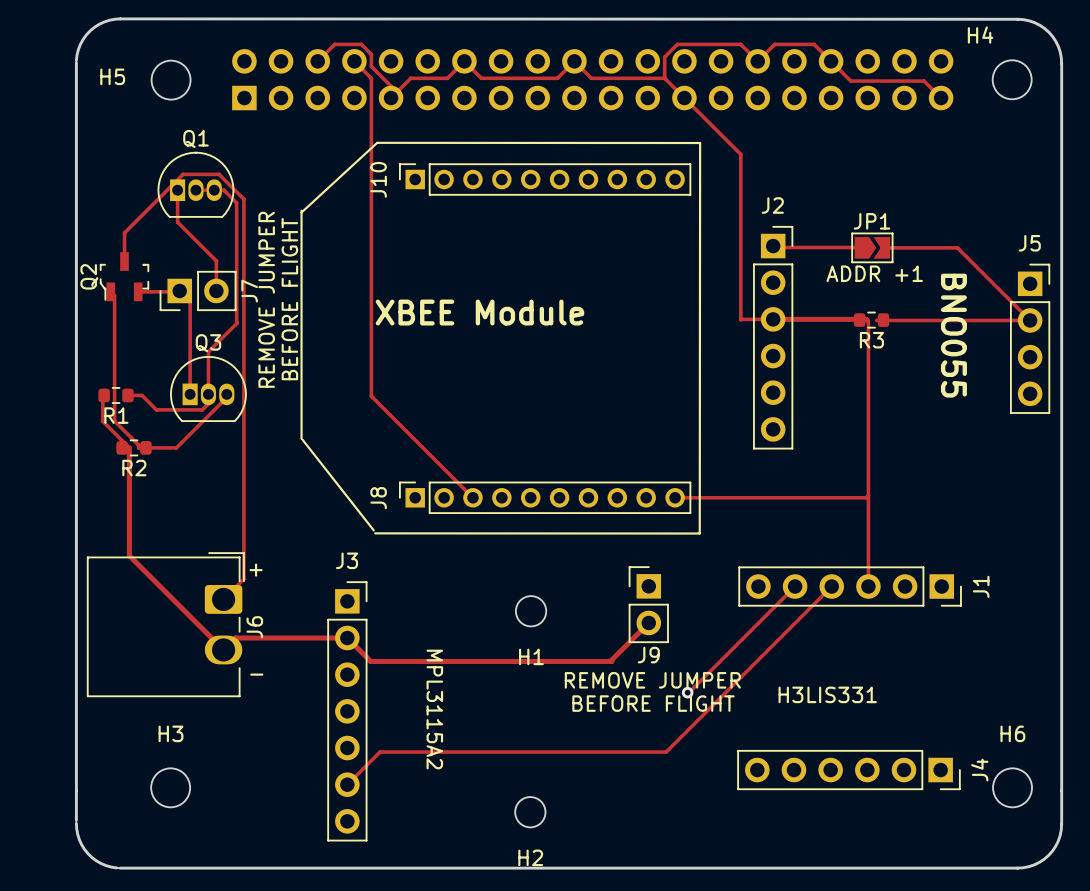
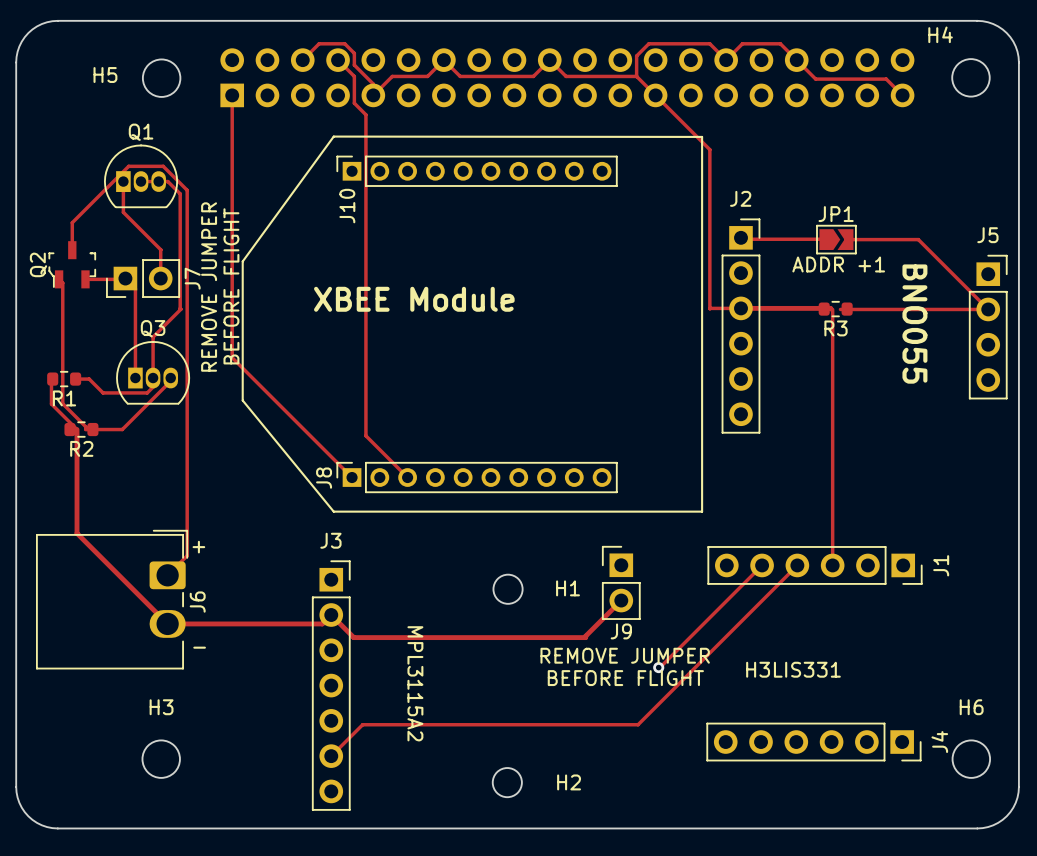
board edge: (120, 18) (1017, 19) (1034, 22) (1048, 32) (1058, 46) (1061, 63) (1061, 824) (1058, 840) (1048, 855) (1034, 864) (1017, 868) (120, 868) (106, 865) (91, 857) (79, 839) (76, 823) (76, 60) (80, 44) (90, 30) (104, 21) (120, 18) -> (57, 20) (41, 24) (28, 33) (19, 46) (16, 62) (16, 786) (21, 807) (32, 819) (41, 825) (57, 828) (977, 828) (998, 822) (1010, 812) (1017, 797) (1018, 786) (1018, 62) (1013, 41) (1002, 29) (988, 22) (977, 20) (57, 20)
track: none -> (232, 95) (232, 357) (352, 477)
track: (371, 106) (371, 396) (472, 497) -> (354, 103) (365, 114) (365, 435) (407, 477)
line: none -> (333, 136) (702, 136) (702, 511) (333, 511) (242, 400) (242, 261) (333, 136)
J10 name position: J10 (378, 179) -> J10 (347, 206)
J10 position: (545, 179) -> (477, 171)
Q1 position: (195, 184) -> (141, 176)
track: (177, 190) (177, 222) (216, 261) -> (123, 181) (123, 212) (160, 249)
track: (195, 190) (223, 190) (236, 202) (237, 322) (208, 351) (208, 403) (202, 409) (156, 409) (142, 395) (129, 395) -> (141, 181) (167, 181) (180, 193) (180, 309) (153, 337) (153, 387) (147, 392) (103, 392) (89, 379) (76, 379)
line: (301, 210) (301, 438) -> none
line: (301, 212) (377, 142) (700, 143) (699, 533) (375, 533) -> none
track: (124, 261) (124, 232) (183, 174) (219, 174) (243, 199) (243, 579) (223, 599) -> (72, 250) (72, 222) (128, 166) (163, 166) (187, 190) (187, 555) (167, 575)
track: (216, 261) (216, 290) -> (160, 249) (160, 278)
Q2 position: (124, 276) -> (72, 264)
J7 position: (198, 290) -> (143, 278)
track: (110, 291) (114, 295) (114, 421) (138, 445) (138, 447) (176, 447) (226, 397) -> (59, 279) (62, 283) (62, 403) (85, 426) (85, 429) (122, 429) (170, 381)
track: (138, 291) (172, 291) -> (85, 279) (118, 279)
text position: REMOVE JUMPER (266, 299) -> REMOVE JUMPER (209, 287)
text position: BEFORE FLIGHT (289, 299) -> BEFORE FLIGHT (231, 286)
track: (190, 301) (190, 394) -> (135, 288) (135, 378)
text position: XBEE Module (479, 312) -> XBEE Module (414, 299)
Q3 position: (208, 388) -> (153, 372)
track: (102, 395) (102, 421) (129, 447) (129, 555) (223, 649) (235, 638) (347, 638) -> (51, 379) (51, 404) (77, 429) (77, 533) (167, 623) (322, 623) (331, 615)
R1 position: (116, 395) -> (64, 379)
line: (302, 439) (373, 530) -> none
R2 position: (134, 447) -> (81, 429)
track: (868, 495) (866, 497) (675, 497) -> none
J8 position: (545, 497) -> (477, 477)
J8 name position: J8 (378, 498) -> J8 (324, 478)
text position: + (256, 570) -> + (198, 547)
J6 position: (165, 624) -> (112, 599)
H1 name position: H1 (531, 656) -> H1 (568, 588)
text position: - (256, 674) -> - (199, 647)
H2 name position: H2 (530, 857) -> H2 (569, 782)

